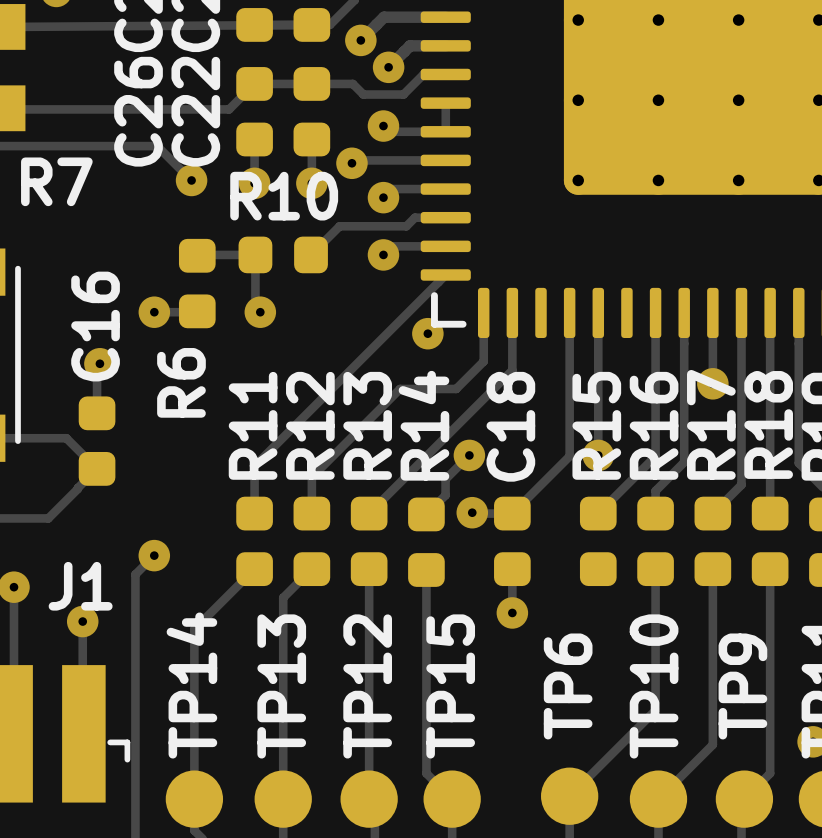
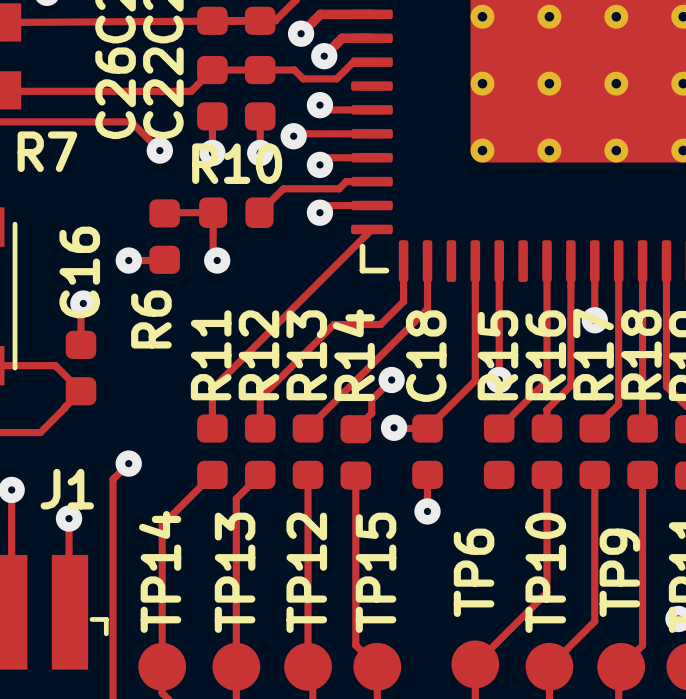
track: (445, 103) (445, 131) -> none
via: (427, 333) -> none

